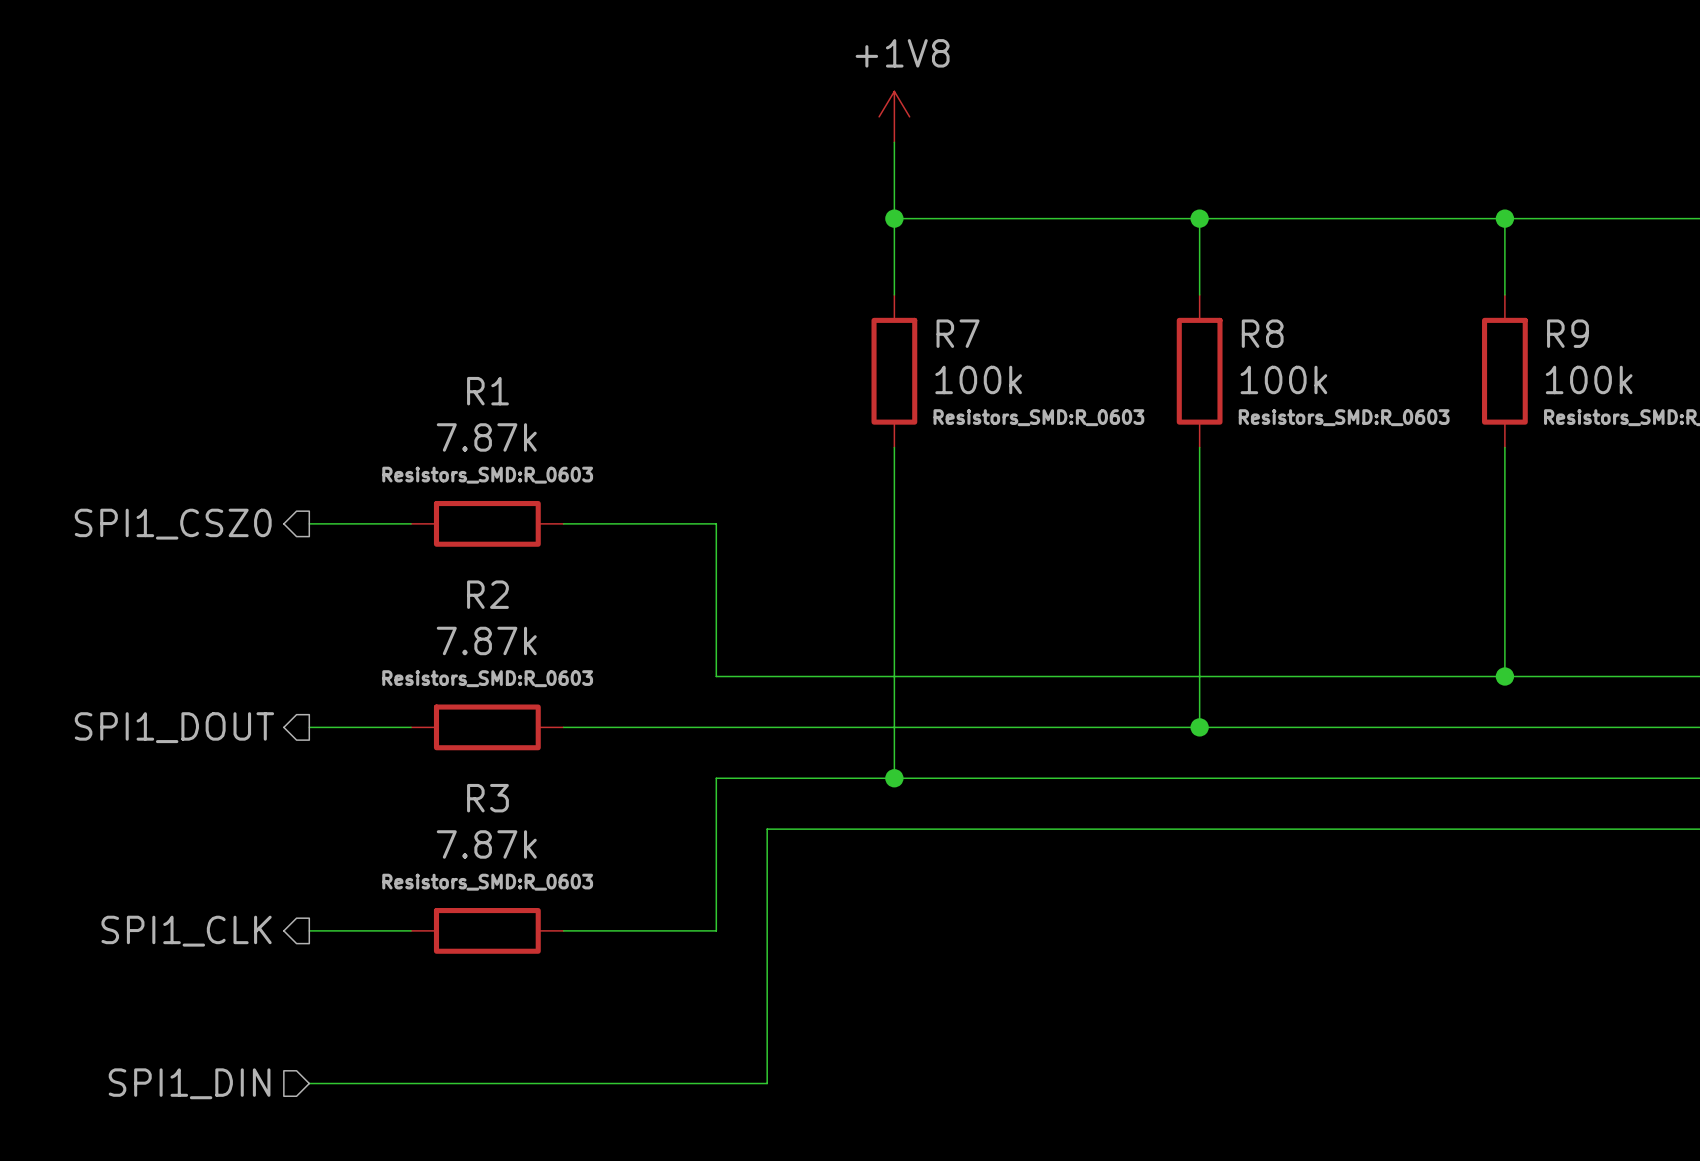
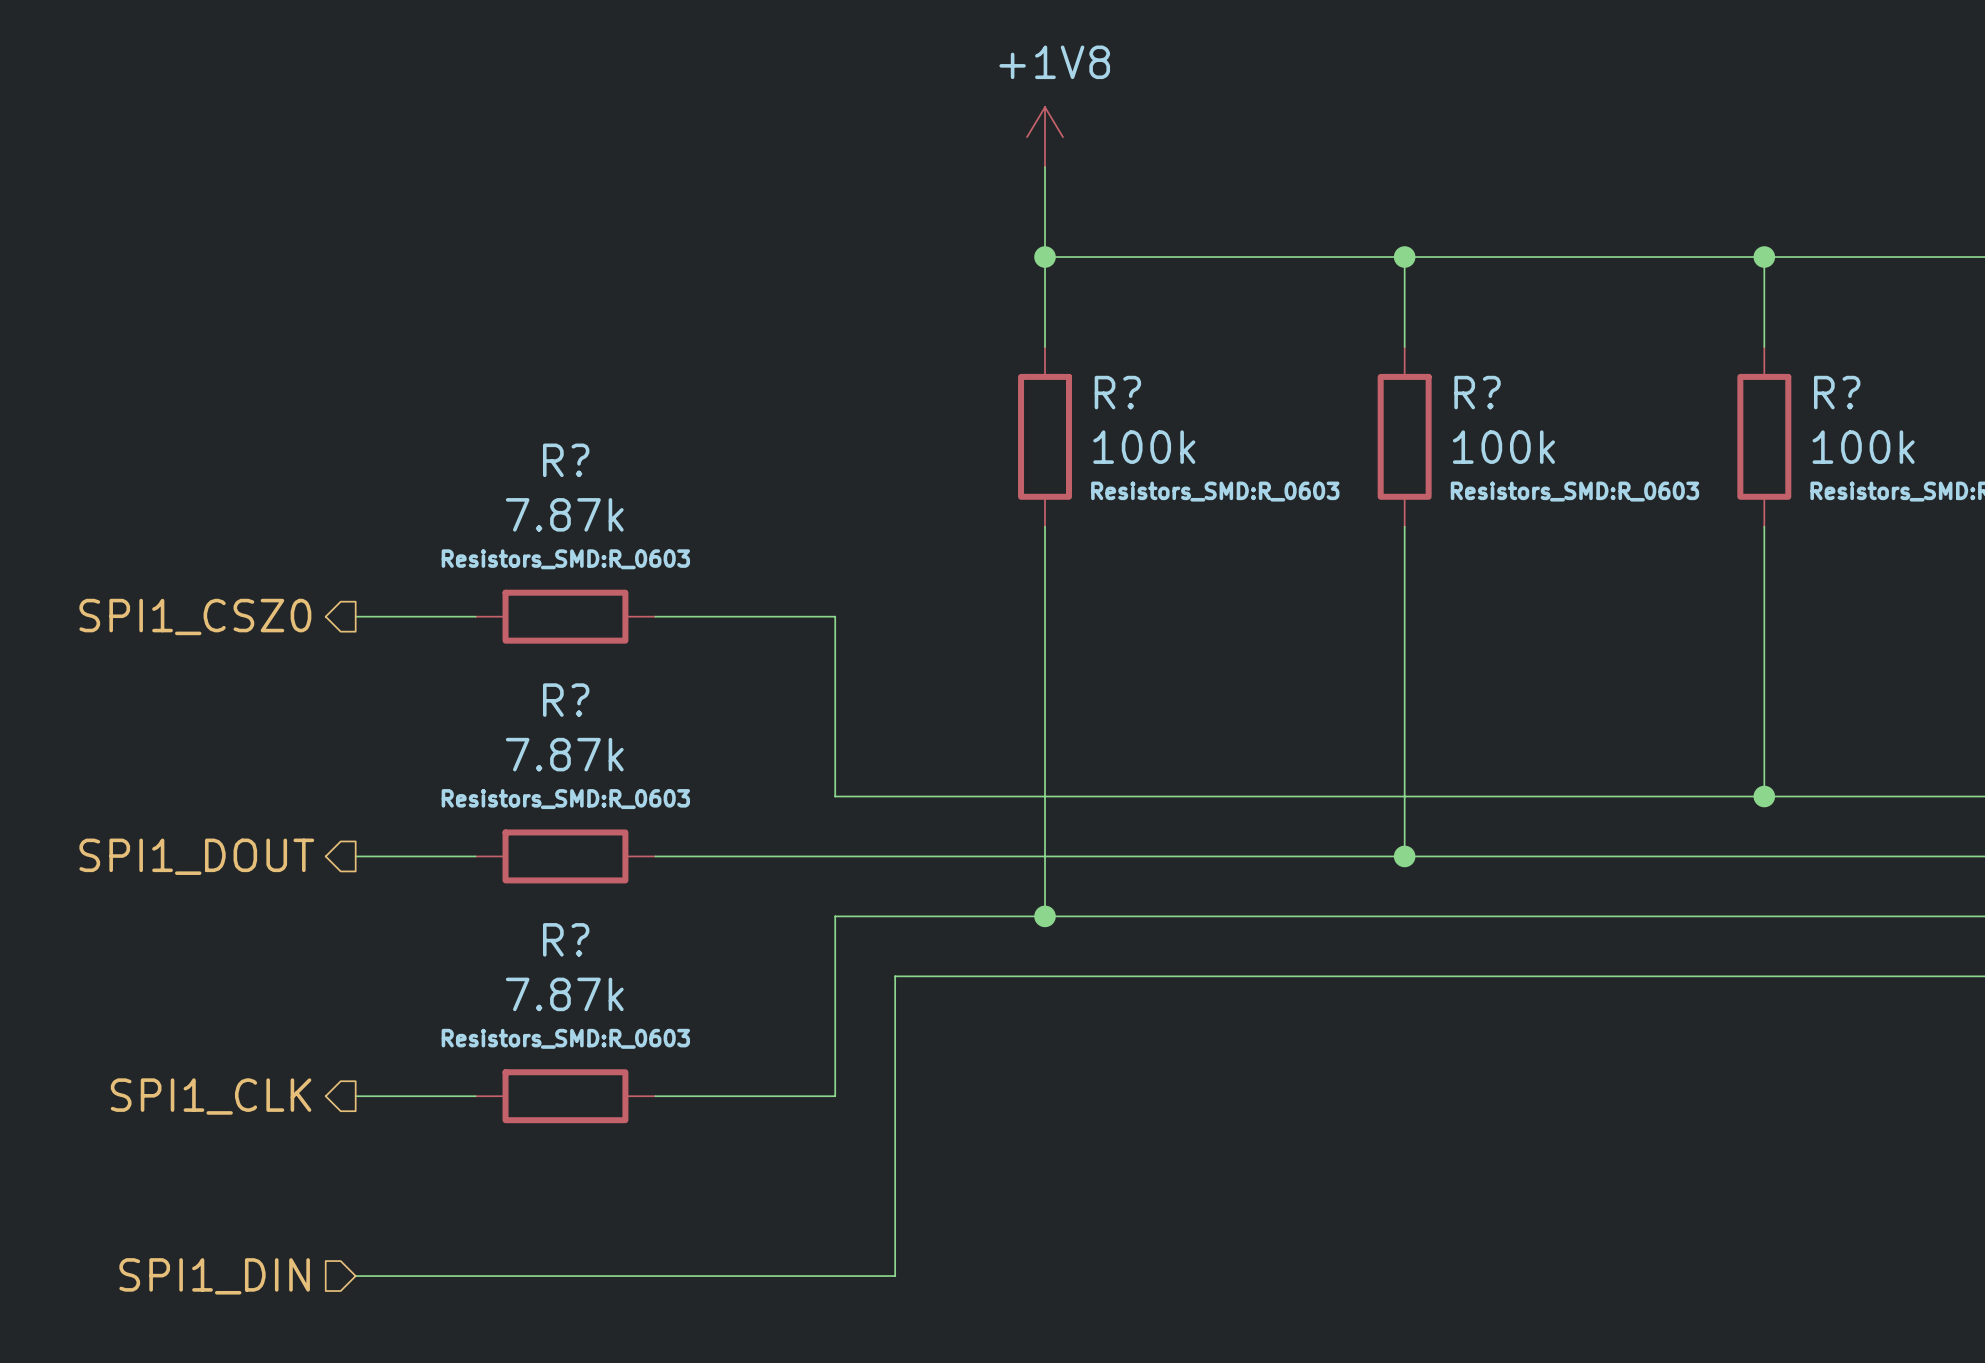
R7 name: R7 (958, 333) -> R? (1117, 392)
R8 name: R8 (1262, 333) -> R? (1477, 392)
R9 name: R9 (1567, 333) -> R? (1837, 392)
R1 name: R1 (487, 391) -> R? (566, 460)
R2 name: R2 (487, 594) -> R? (566, 700)
R3 name: R3 (487, 798) -> R? (566, 939)

